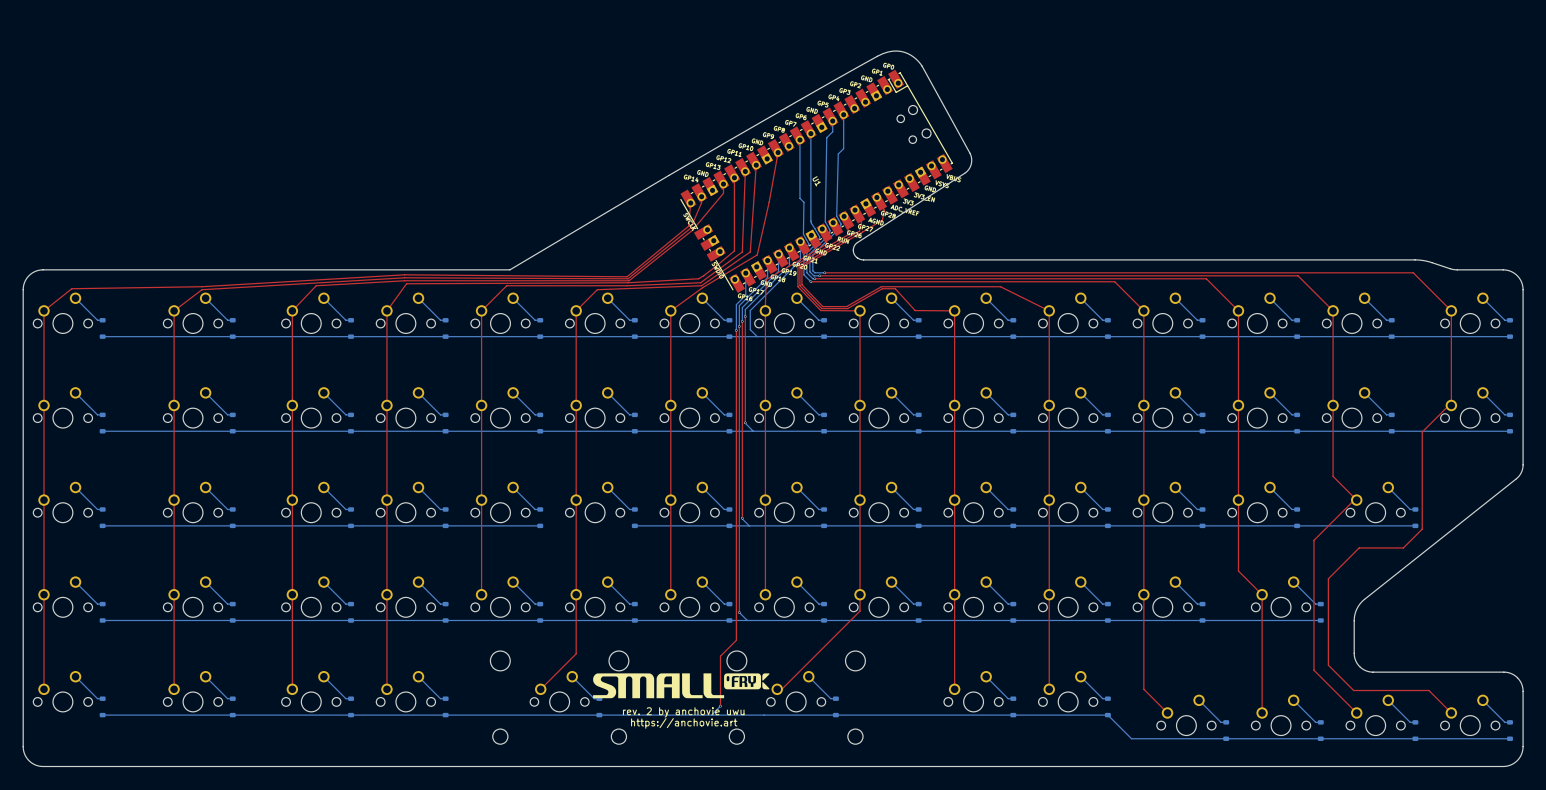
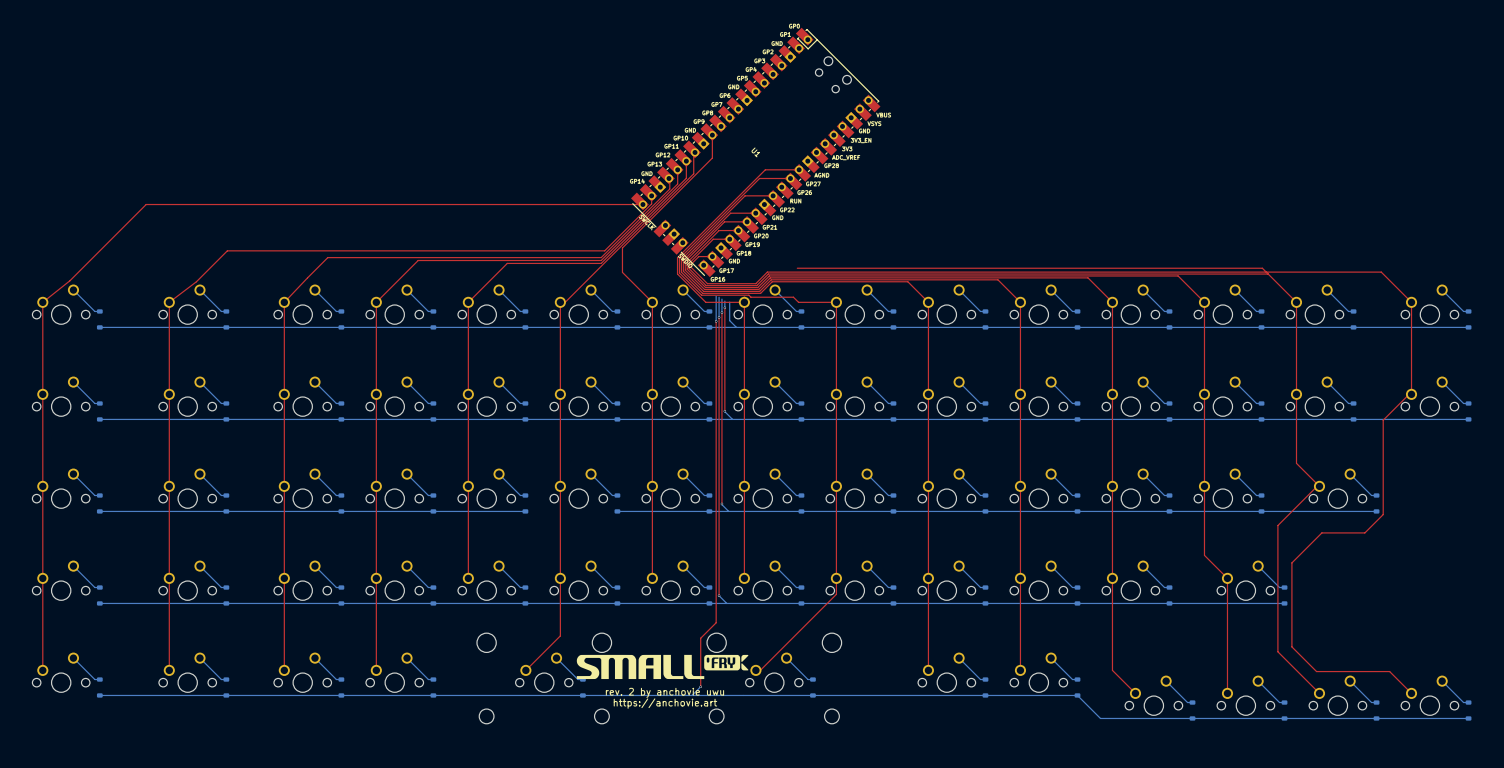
board edge: (877, 56) (887, 52) (900, 51) (910, 55) (919, 62) (969, 152) (971, 161) (969, 168) (964, 173) (856, 243) (853, 252) (860, 259) (1416, 259) (1454, 269) (1507, 270) (1518, 277) (1523, 289) (1523, 464) (1521, 472) (1516, 478) (1363, 600) (1356, 610) (1354, 620) (1354, 657) (1359, 665) (1366, 671) (1504, 672) (1516, 677) (1522, 689) (1523, 746) (1521, 754) (1515, 761) (1503, 766) (43, 766) (35, 764) (27, 759) (23, 746) (23, 289) (24, 281) (30, 274) (43, 269) (509, 269) (675, 171) (877, 56) -> none
bottom track: (843, 114) (843, 148) (838, 154) (836, 216) (841, 224) (839, 228) (812, 254) (812, 270) (814, 272) (824, 272) -> none
bottom track: (832, 121) (832, 131) (826, 137) (825, 221) (830, 230) (828, 235) (809, 253) (809, 271) (813, 275) (819, 275) -> none
bottom track: (810, 133) (810, 221) (819, 237) (817, 242) (806, 252) (806, 272) (814, 278) -> none
bottom track: (799, 139) (799, 198) (803, 202) (803, 234) (808, 244) (803, 250) (803, 274) (810, 281) -> none
top track: (778, 152) (757, 254) (702, 287) (670, 310) -> (712, 135) (712, 158) (622, 247) (622, 272) (652, 302)
top track: (747, 156) (756, 165) (750, 251) (701, 285) (597, 289) (576, 310) -> (695, 152) (693, 151) (693, 173) (565, 302) (560, 302)
top track: (745, 171) (742, 251) (700, 282) (627, 285) (506, 285) -> (686, 161) (686, 178) (601, 263) (507, 263) (492, 277)
top track: none -> (799, 169) (765, 169) (677, 257) (677, 274) (705, 302) (744, 302)
top track: (734, 177) (734, 250) (698, 278) (628, 282) (406, 283) (386, 310) -> (677, 169) (677, 184) (601, 260) (418, 260) (376, 302)
part rotation: 0° (816, 181) -> 15° counterclockwise (755, 152)
top track: (723, 184) (723, 193) (692, 230) (629, 280) (404, 280) (316, 285) -> (669, 178) (669, 189) (601, 257) (327, 257) (307, 277)
top track: (701, 196) (701, 202) (690, 228) (628, 278) (404, 277) (201, 289) -> (651, 195) (651, 203) (604, 250) (227, 250) (196, 281)
top track: (876, 197) (884, 210) (882, 220) (801, 266) (801, 284) (822, 306) (846, 306) (881, 286) (1000, 286) (1049, 310) -> (755, 213) (730, 213) (683, 260) (683, 271) (703, 291) (759, 291) (771, 279) (997, 279) (1020, 302)
top track: (690, 203) (688, 226) (627, 276) (404, 274) (201, 286) (71, 288) -> (642, 204) (146, 204) (69, 280)
top track: (855, 210) (861, 222) (859, 231) (799, 265) (799, 285) (821, 308) (847, 308) (882, 288) (895, 288) (915, 310) (954, 310) -> (773, 195) (745, 195) (681, 259) (681, 272) (702, 293) (760, 293) (772, 281) (907, 281) (928, 302)
top track: (844, 216) (848, 220) (847, 235) (797, 263) (797, 286) (820, 310) (860, 310) -> (790, 178) (759, 178) (679, 258) (679, 273) (701, 295) (793, 297) (798, 302) (836, 302)
top track: none -> (747, 221) (724, 221) (685, 261) (685, 270) (704, 289) (758, 289) (770, 277) (1088, 277)
top track: (822, 229) (826, 233) (826, 244) (766, 279) (765, 305) -> none
bottom track: (800, 241) (800, 260) (750, 310) -> none
top track: none -> (729, 239) (713, 239) (689, 263) (689, 268) (706, 285) (756, 285) (768, 274) (788, 274)
bottom track: (789, 247) (789, 265) (745, 309) -> none
bottom track: (778, 254) (778, 271) (742, 307) -> none
bottom track: (767, 260) (767, 277) (739, 305) -> none
top track: (824, 272) (1413, 272) (1420, 279) -> (712, 256) (698, 256) (691, 264) (691, 267) (707, 283) (755, 283) (767, 272) (1381, 272)
via: (824, 272) -> none
bottom track: (745, 273) (745, 295) (736, 304) -> none
via: (819, 275) -> none
top track: (814, 278) (1206, 278) (1211, 283) -> (738, 230) (719, 230) (687, 262) (687, 269) (705, 287) (757, 287) (769, 275) (1178, 275)
via: (814, 278) -> none
via: (810, 281) -> none
top track: (1114, 281) (1118, 285) -> (1084, 274) (1268, 274)

